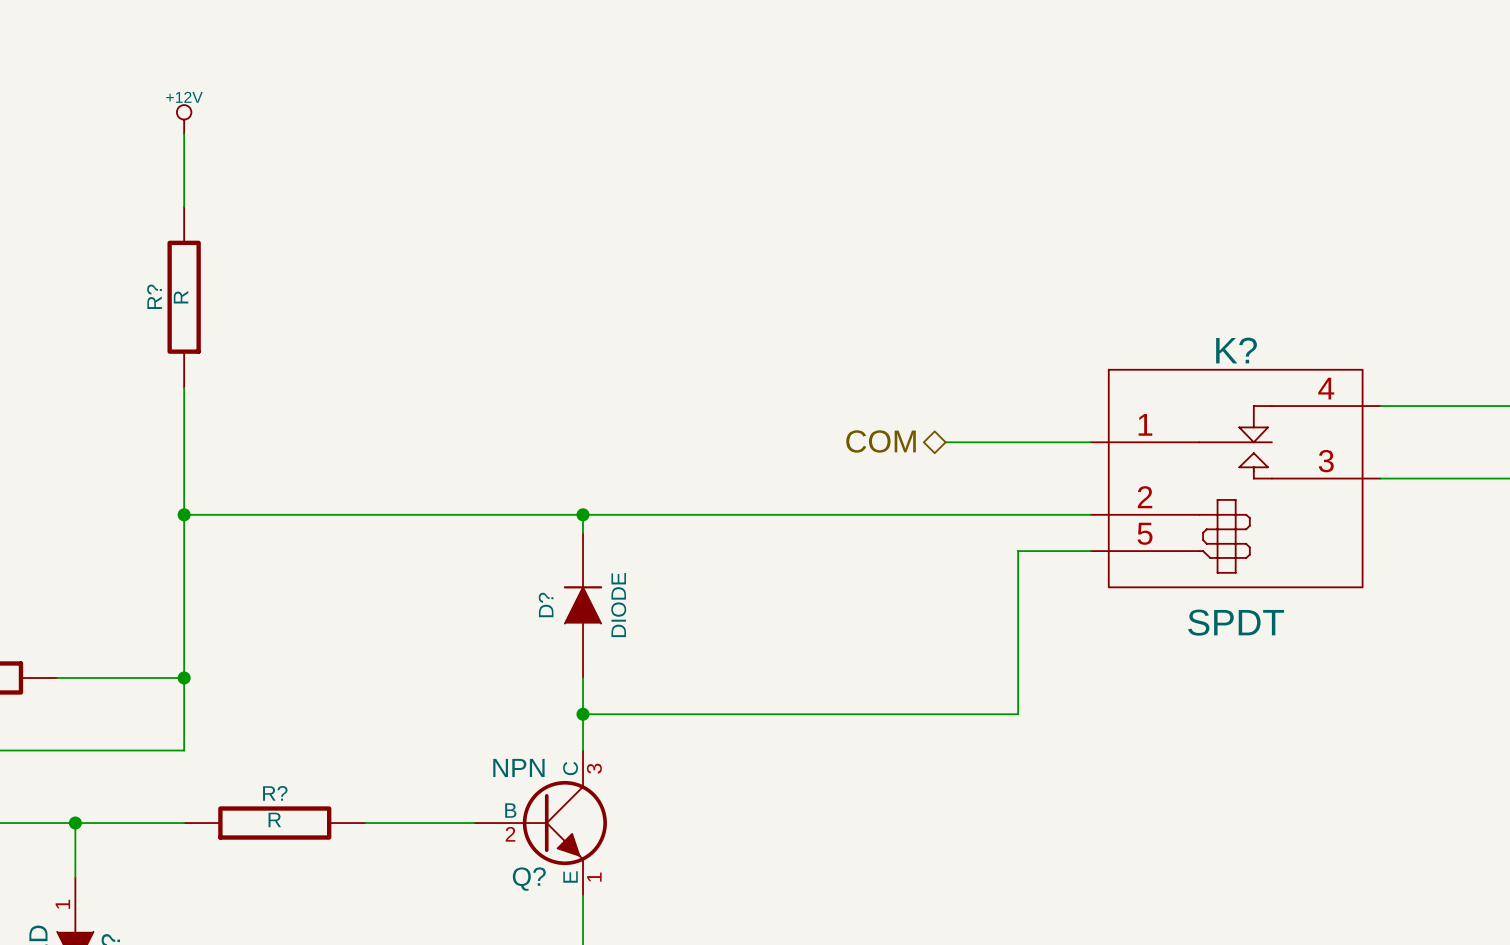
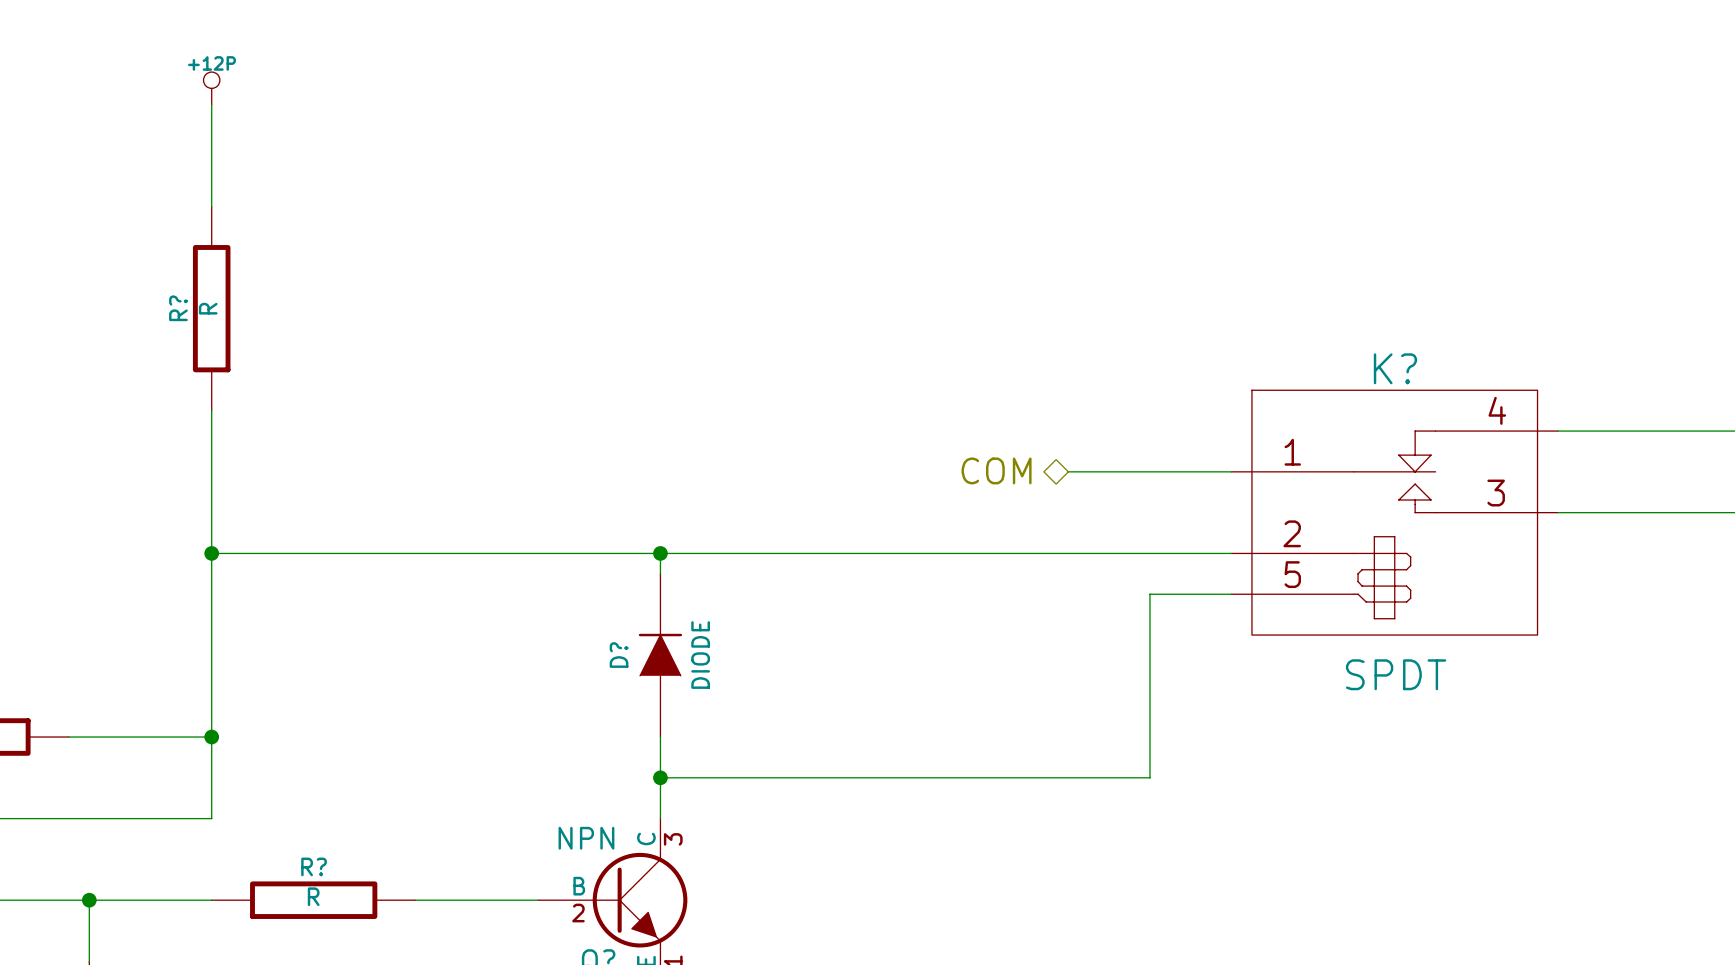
power symbol: none -> +12P (211, 88)
power symbol: +12V (184, 119) -> none

